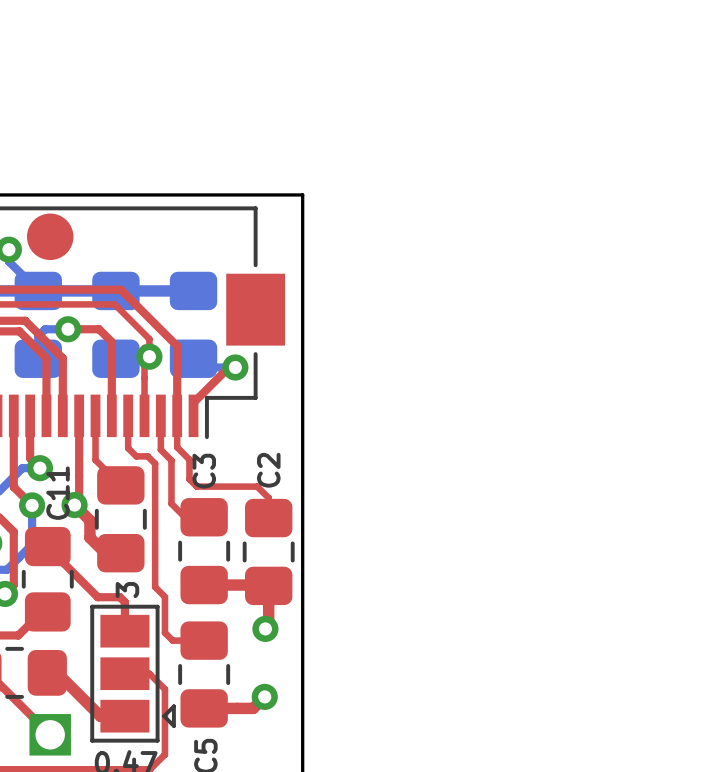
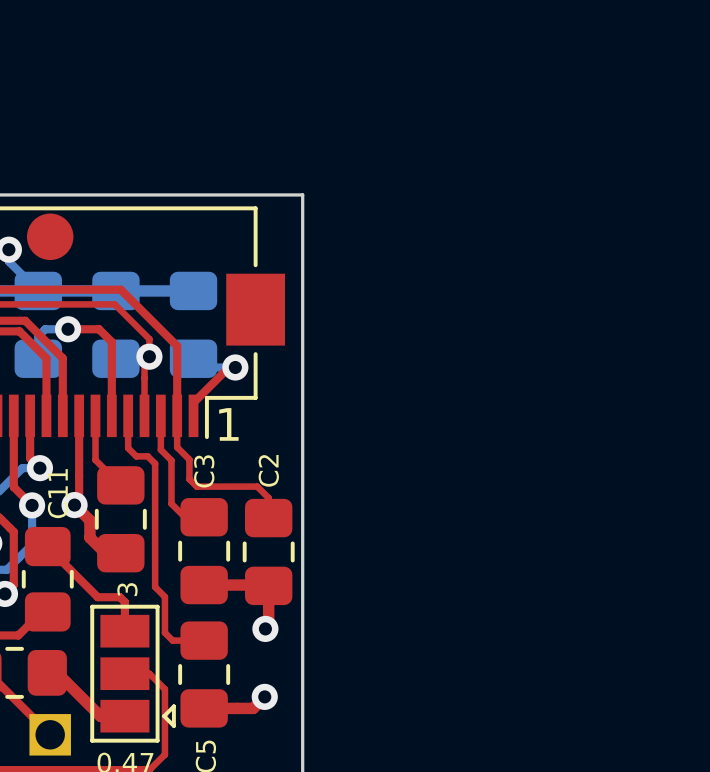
text: none -> 1 (228, 424)

